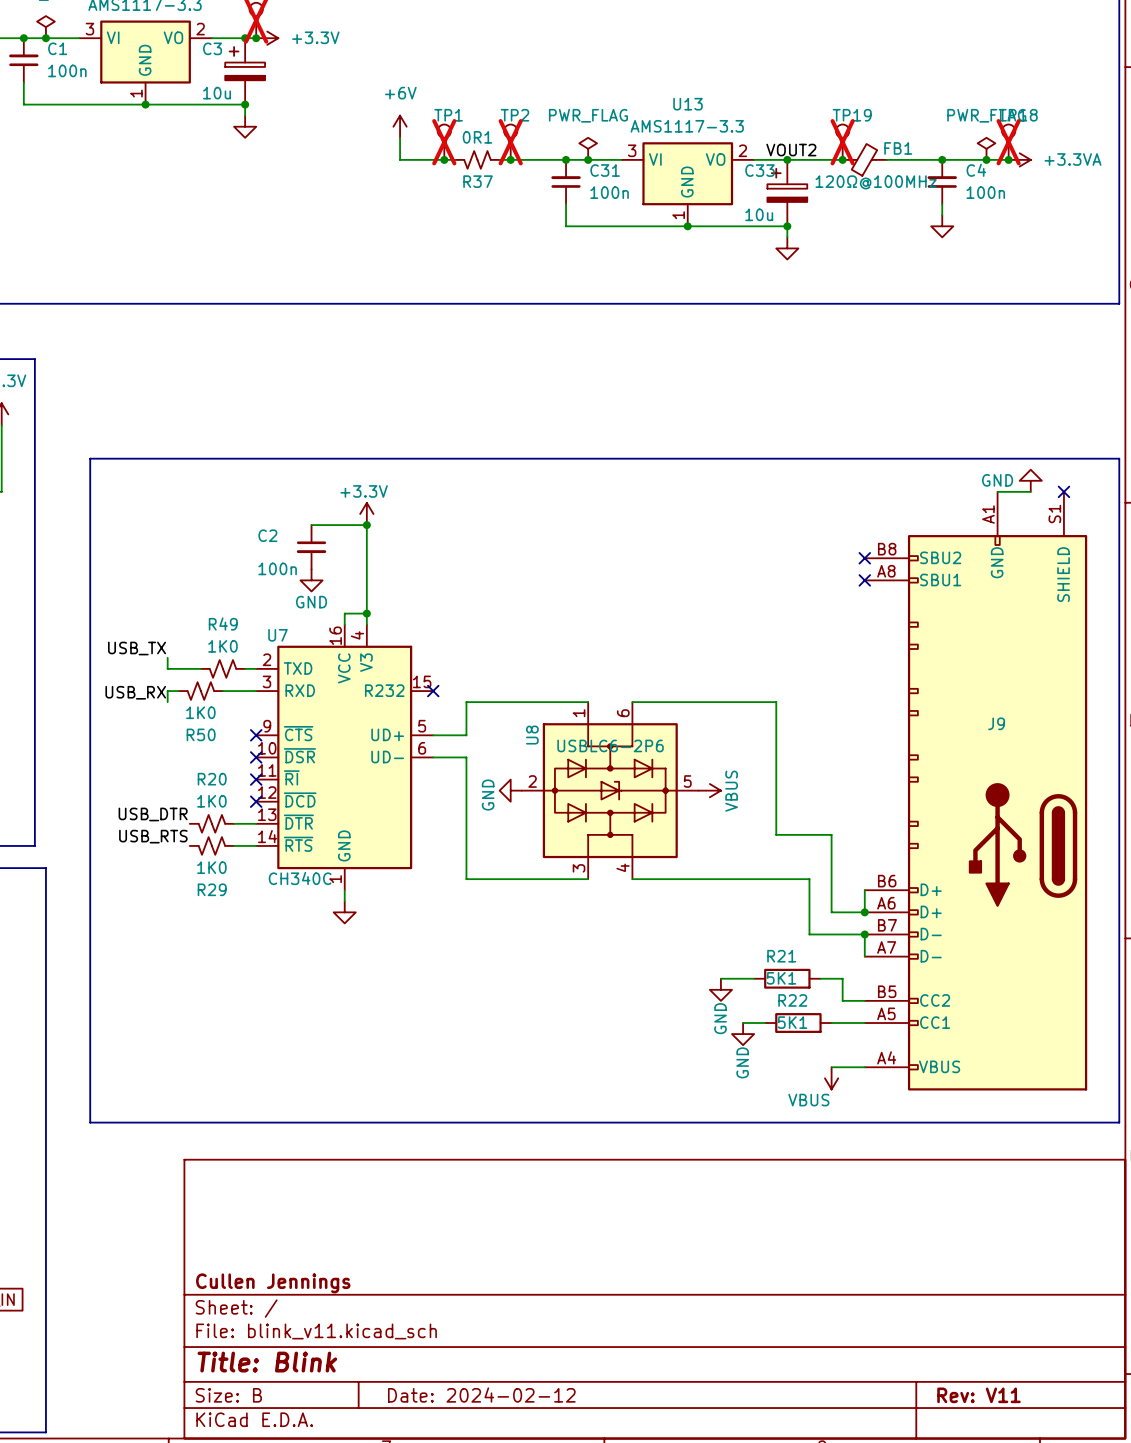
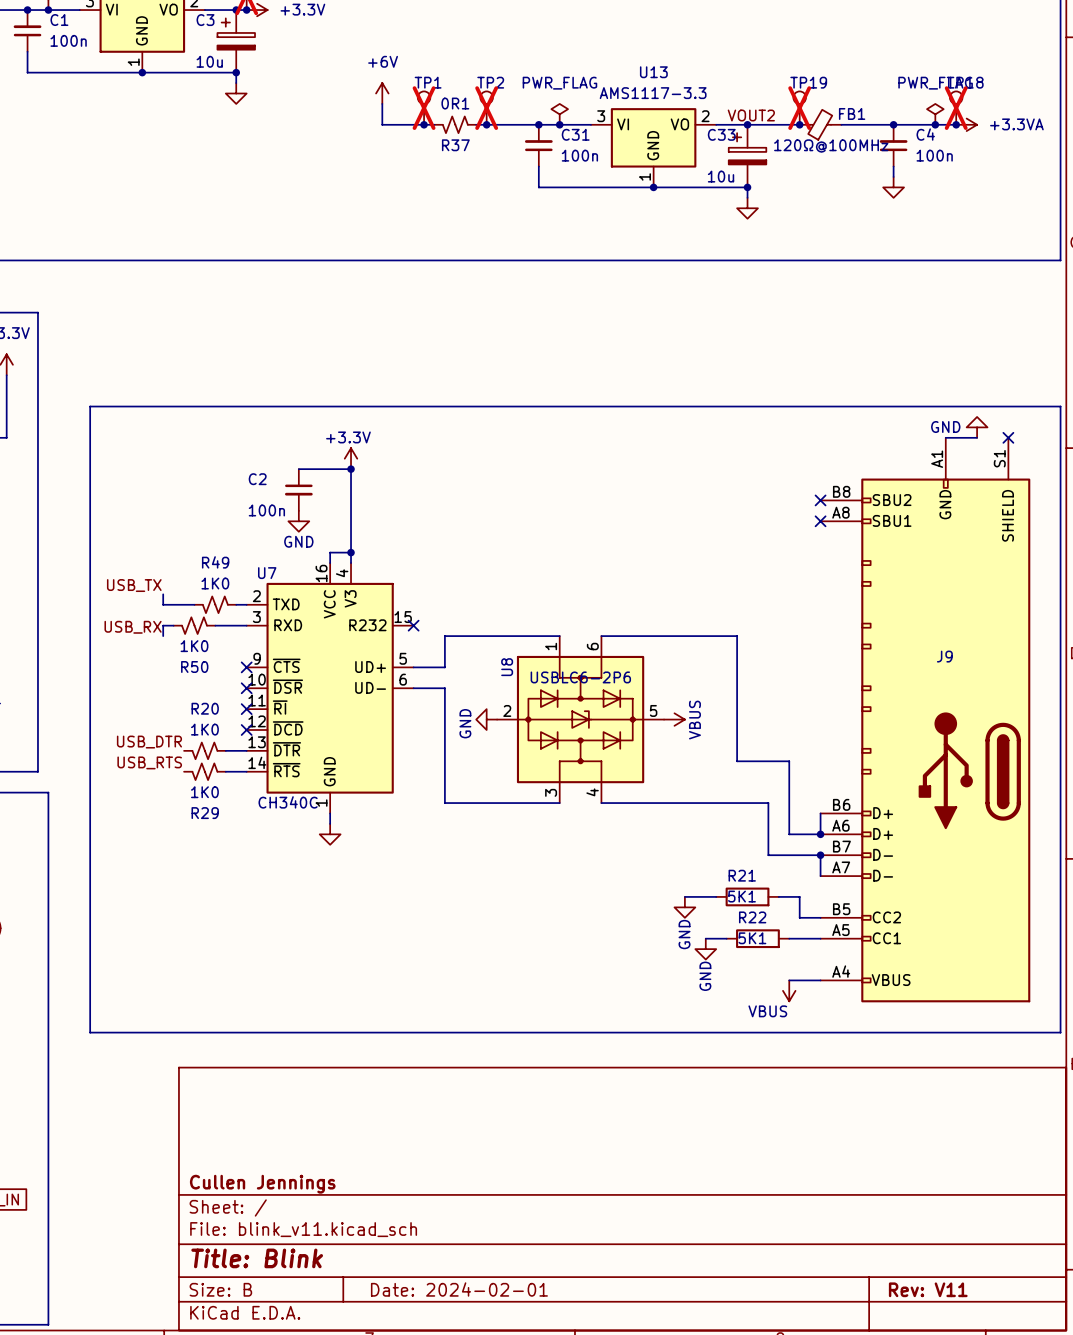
title block: Date: 2024-02-12 (481, 1395) -> Date: 2024-02-01 (459, 1289)

